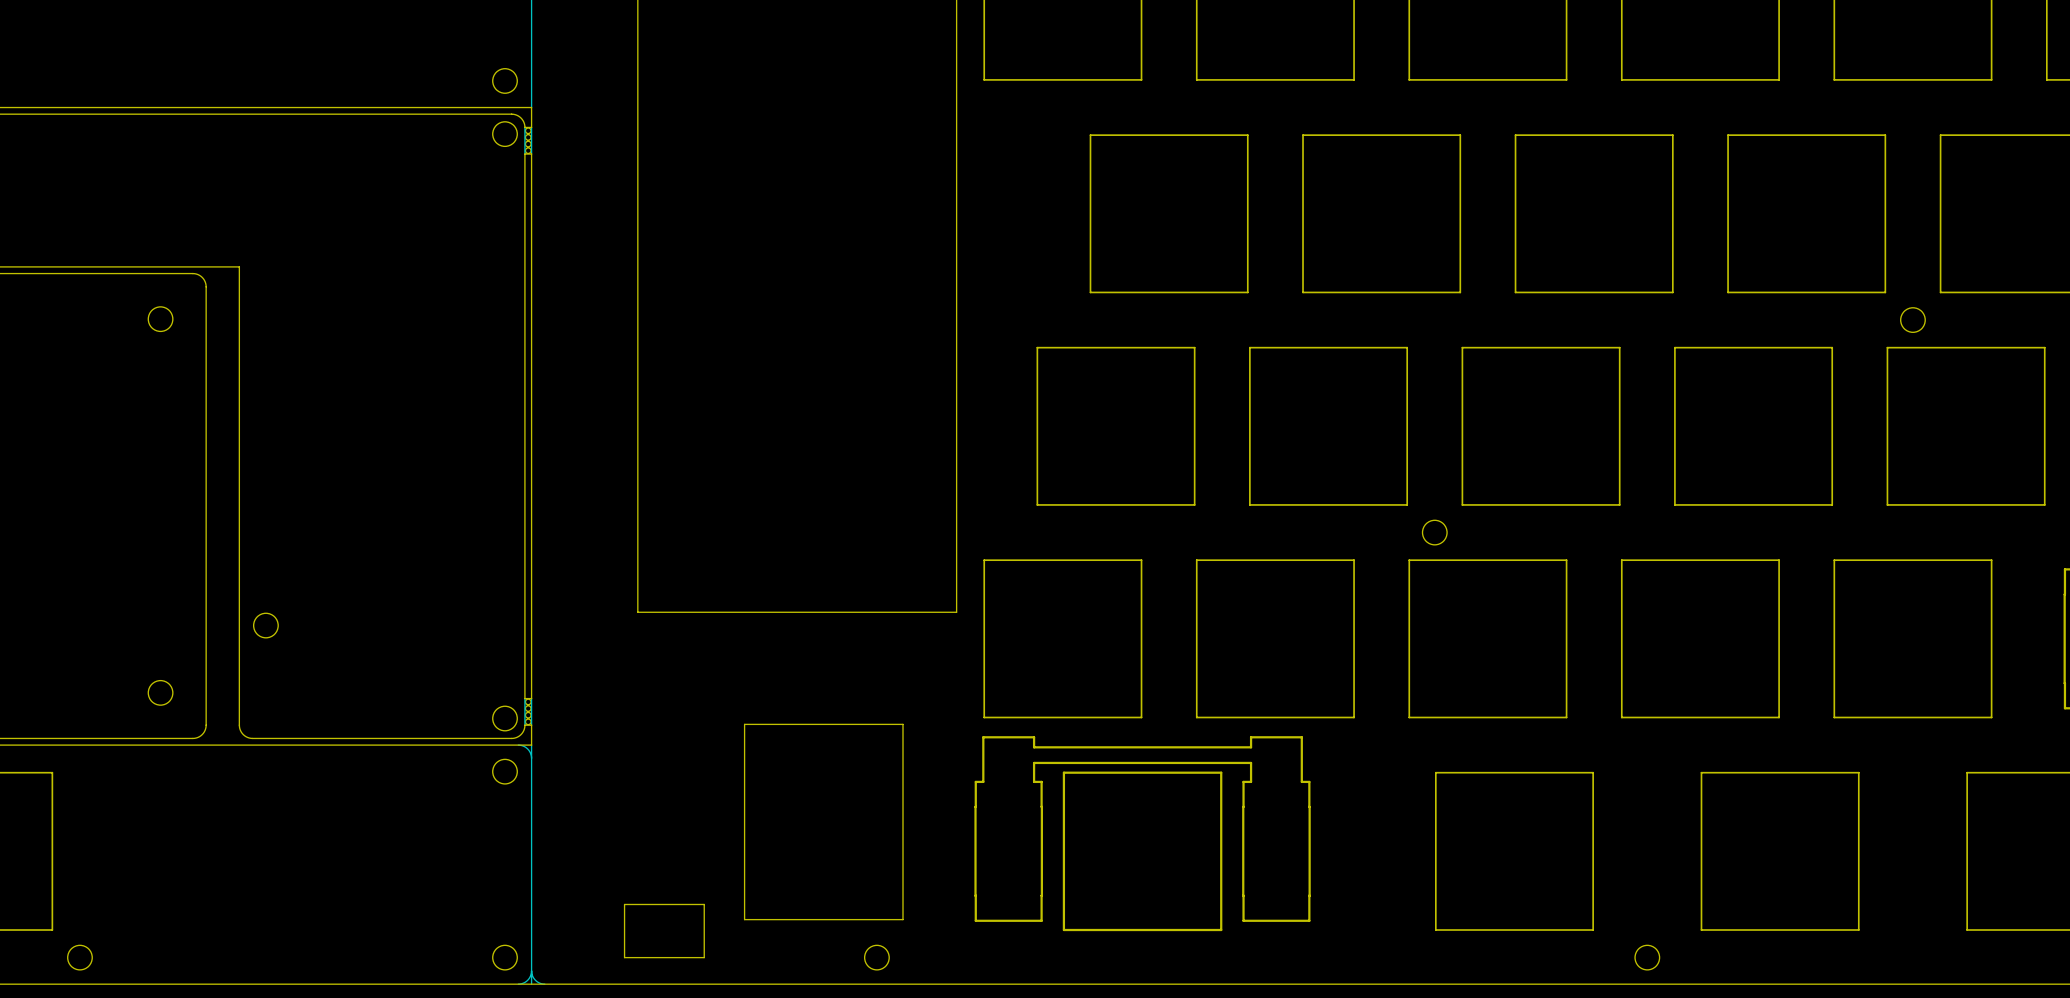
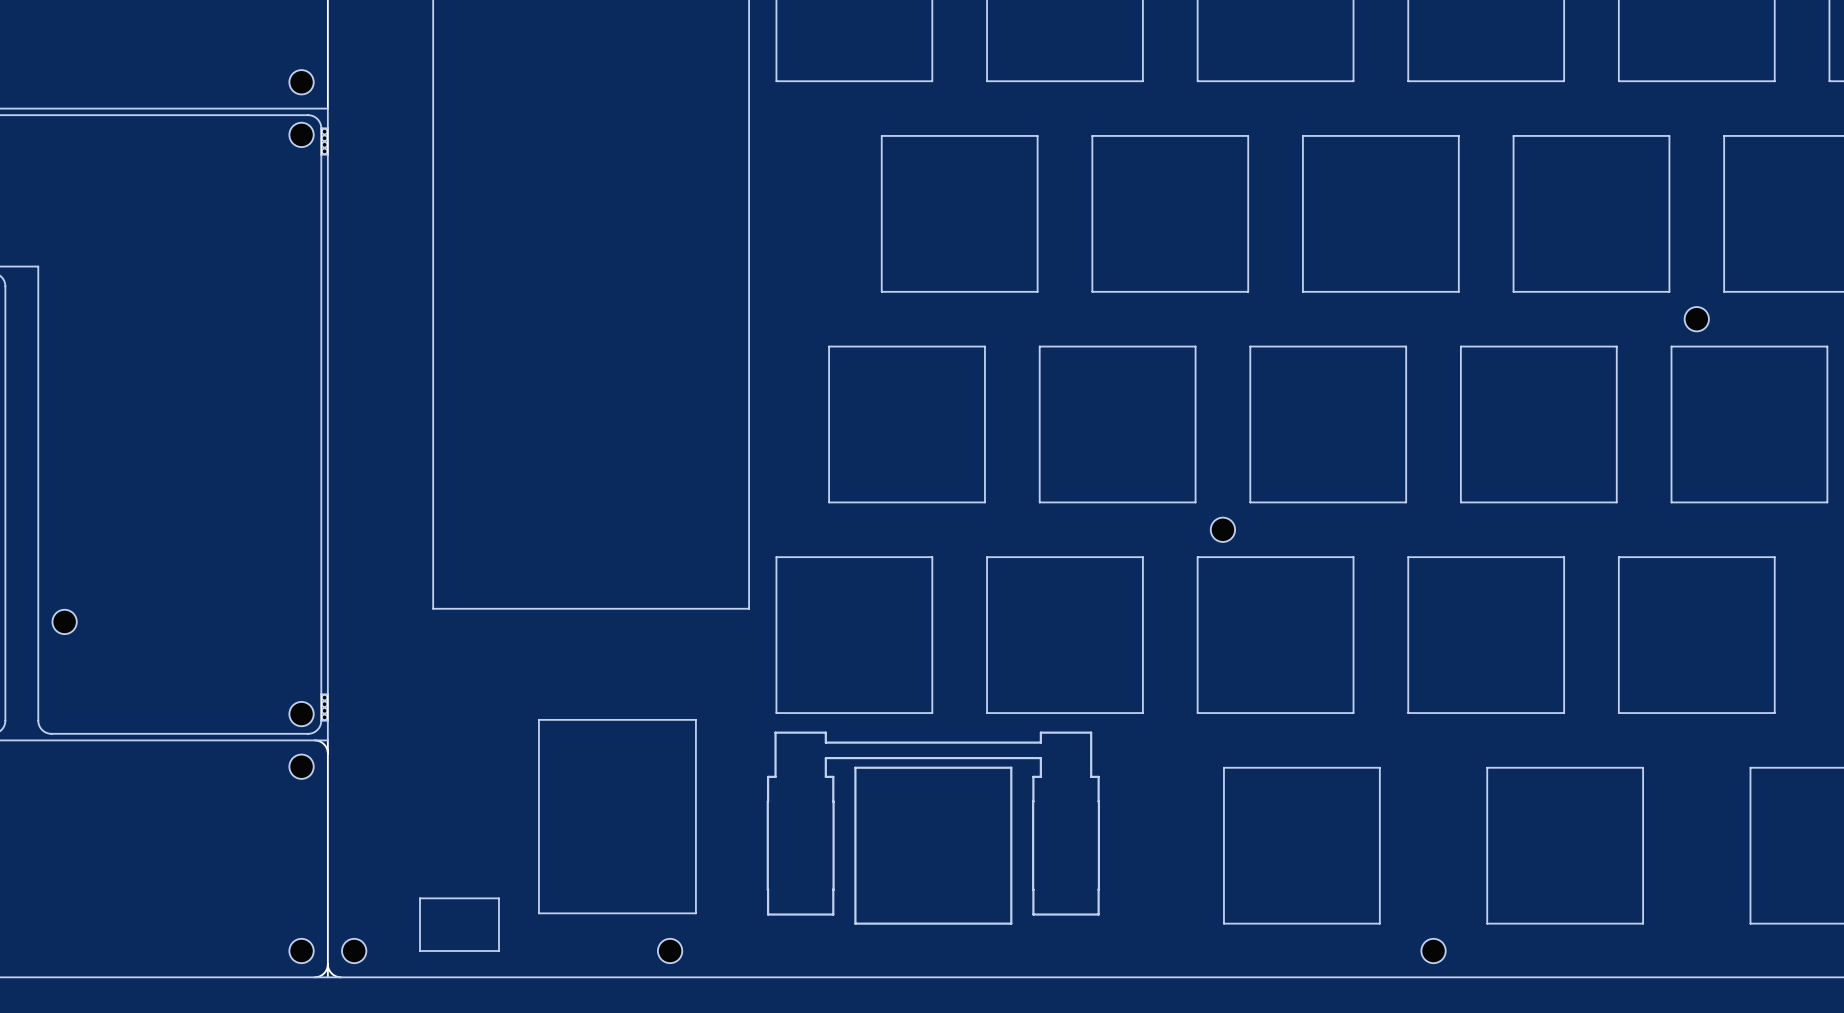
part: none -> (354, 951)

